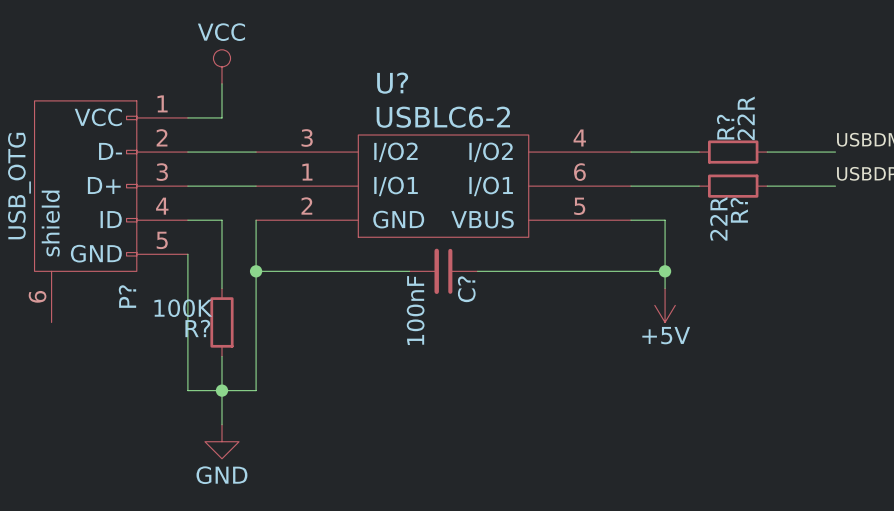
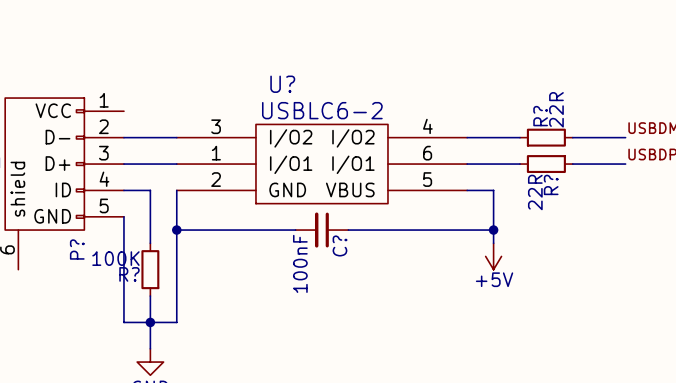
power symbol: VCC (221, 66) -> none
wire: (221, 83) (221, 117) (187, 117) -> none

